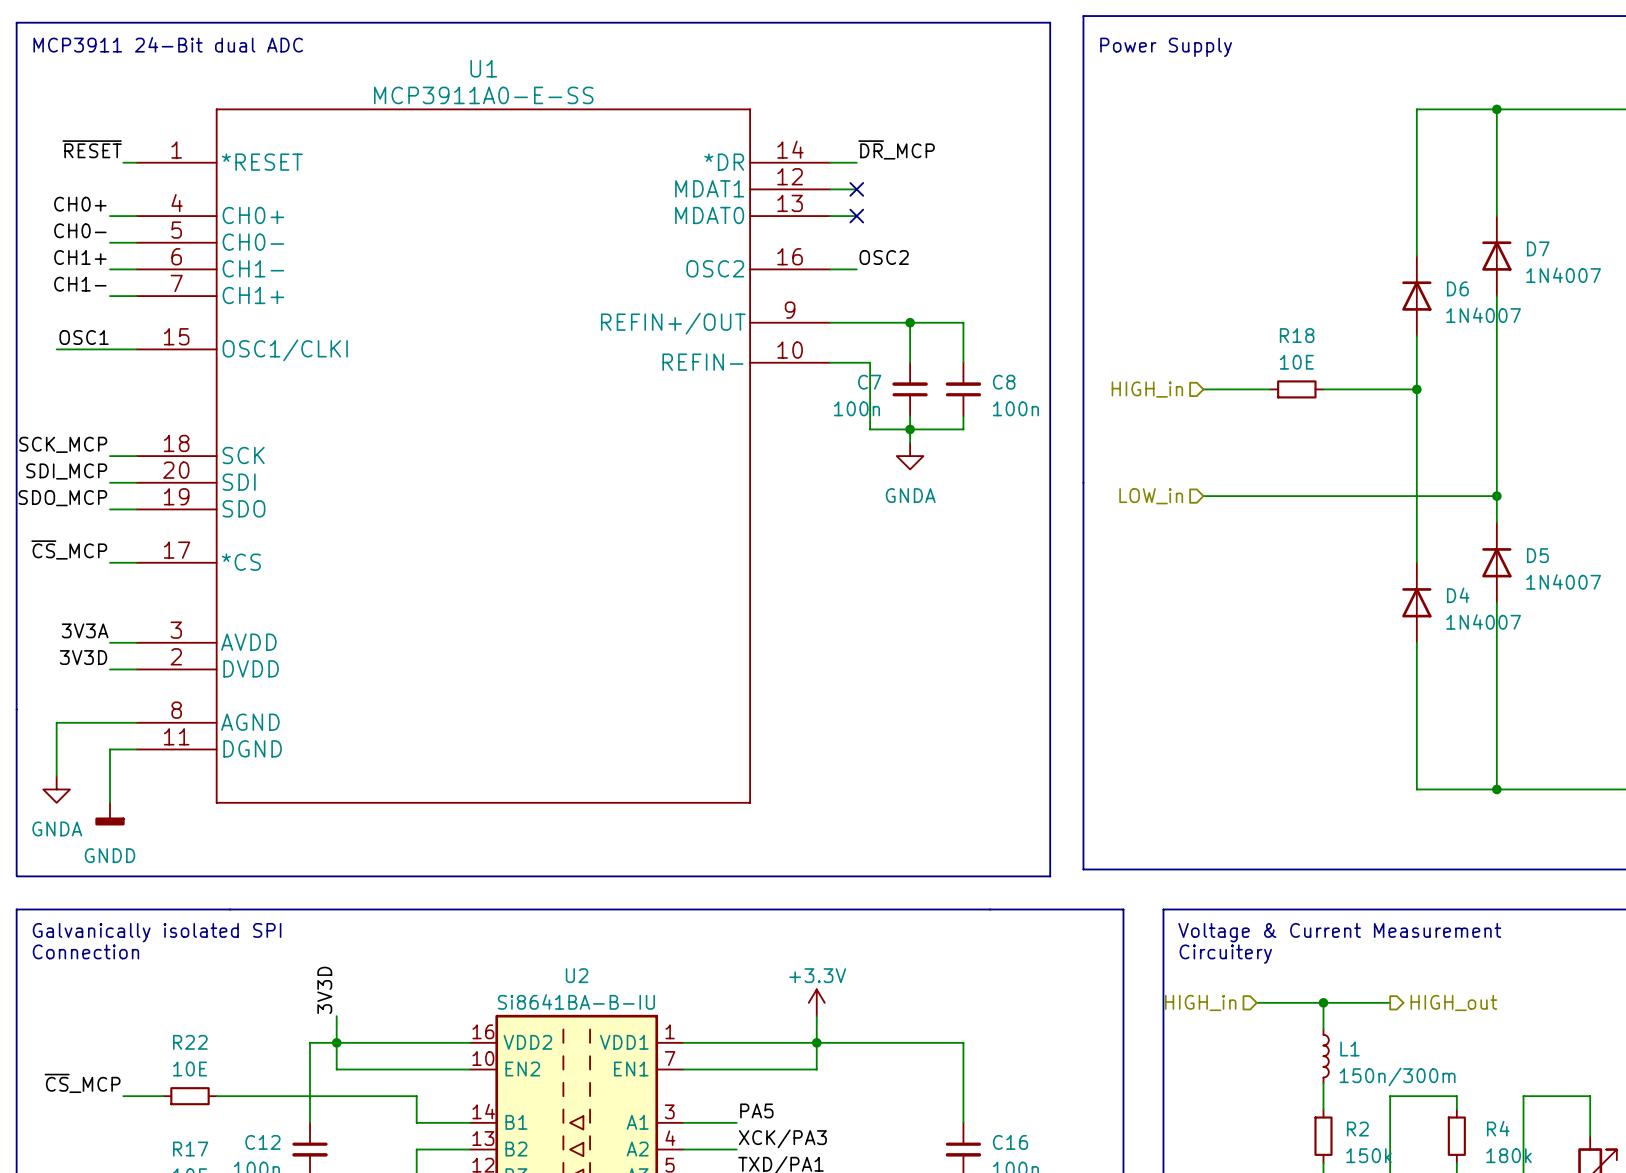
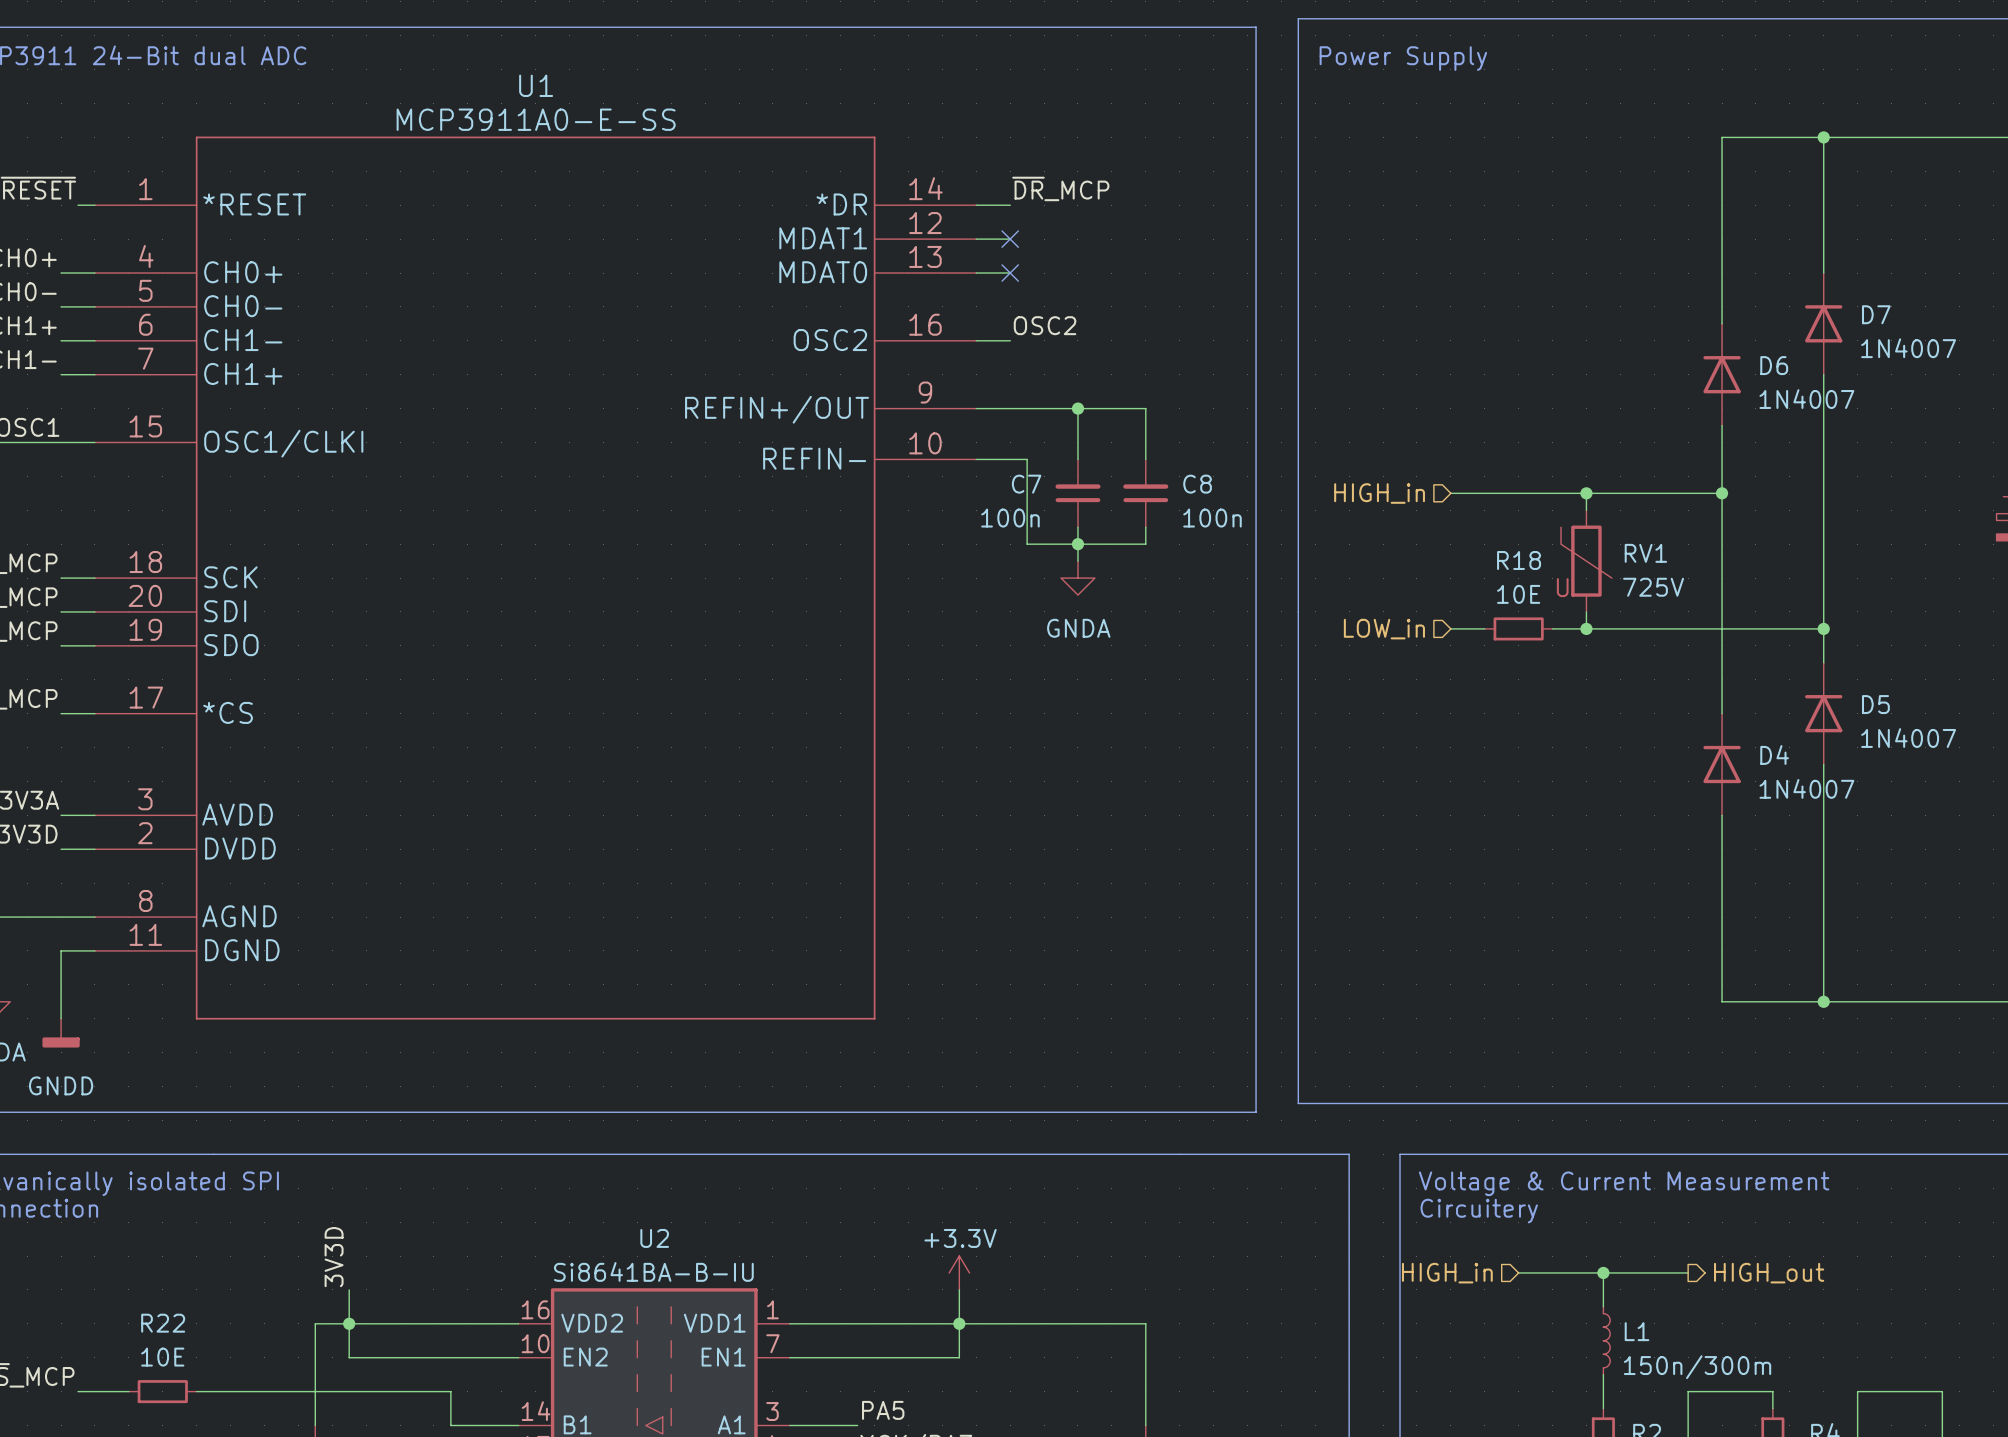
R18 position: (1296, 389) -> (1518, 628)
wire: none -> (1586, 493) (1586, 510)
junction: none -> (1586, 493)
RV1: none -> 725V (1586, 561)
wire: none -> (1586, 611) (1586, 628)
wire: (1230, 496) (1283, 496) -> (1535, 493) (1603, 493)
junction: none -> (1586, 628)

